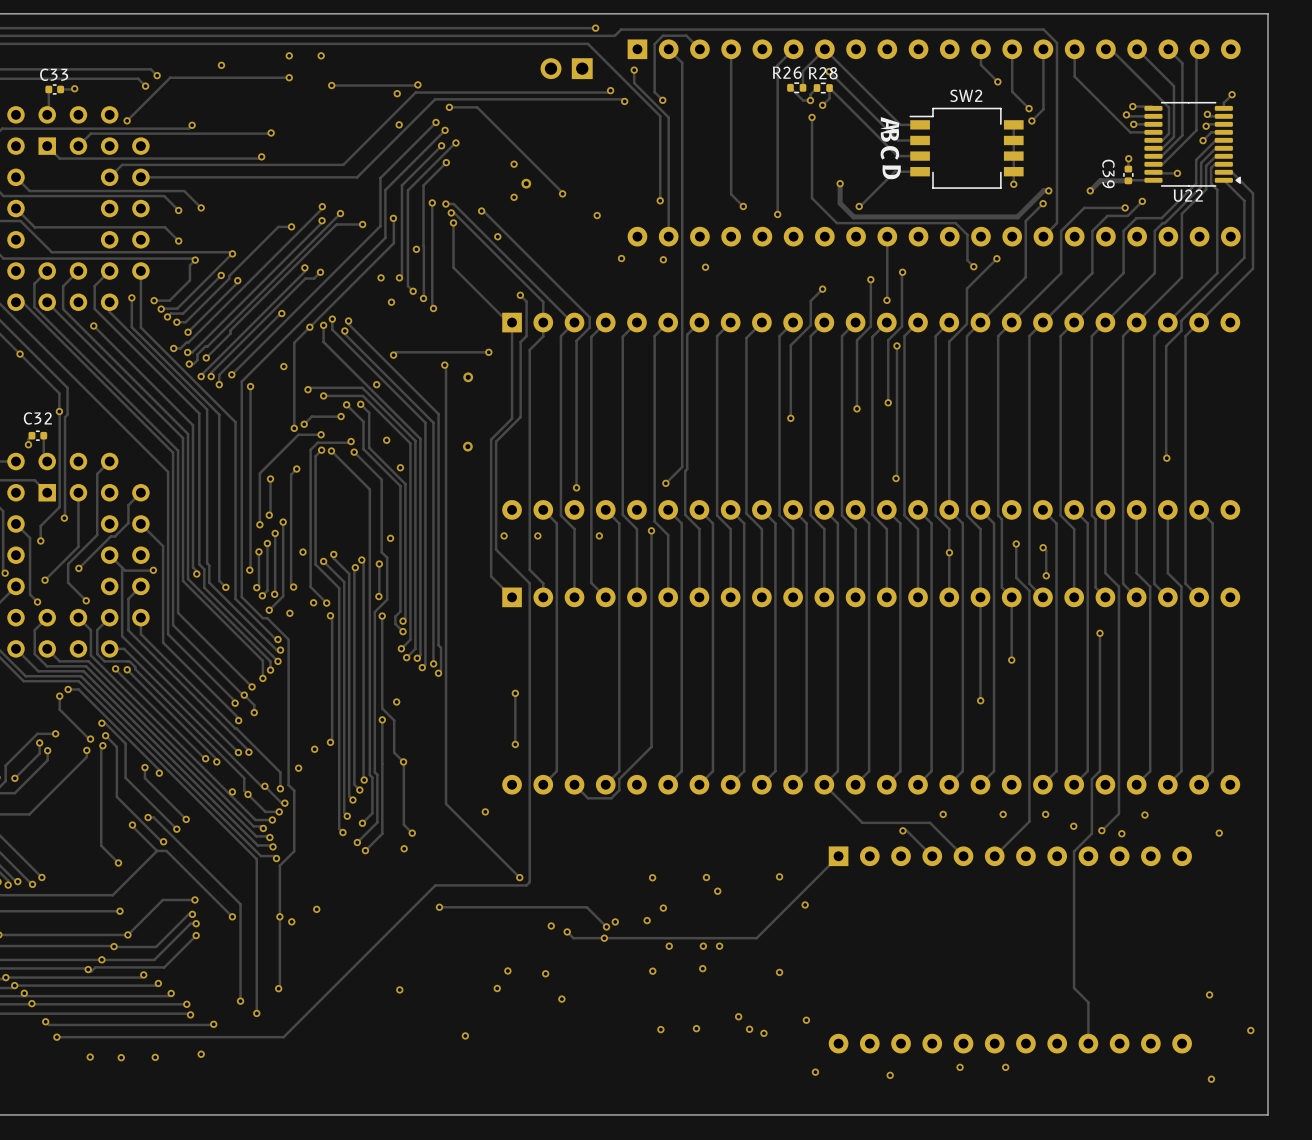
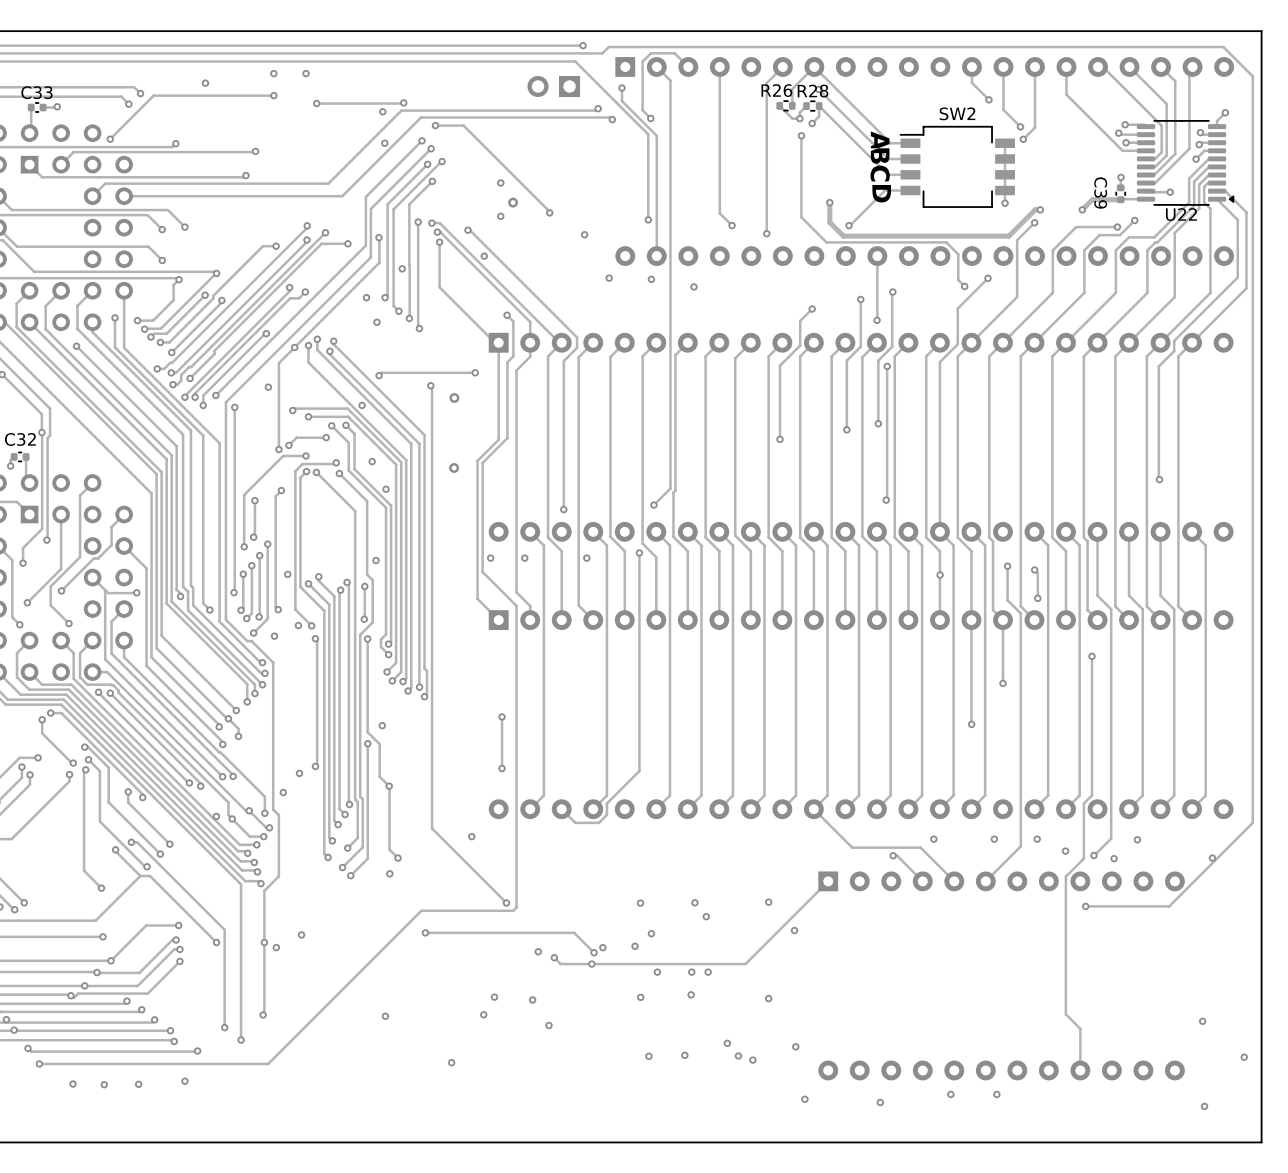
track: (1043, 29) (1056, 42) (1056, 223) (1043, 236) -> (1035, 47) (1223, 47) (1252, 76) (1252, 822) (1169, 906) (1085, 906)
via: none -> (1085, 906)

